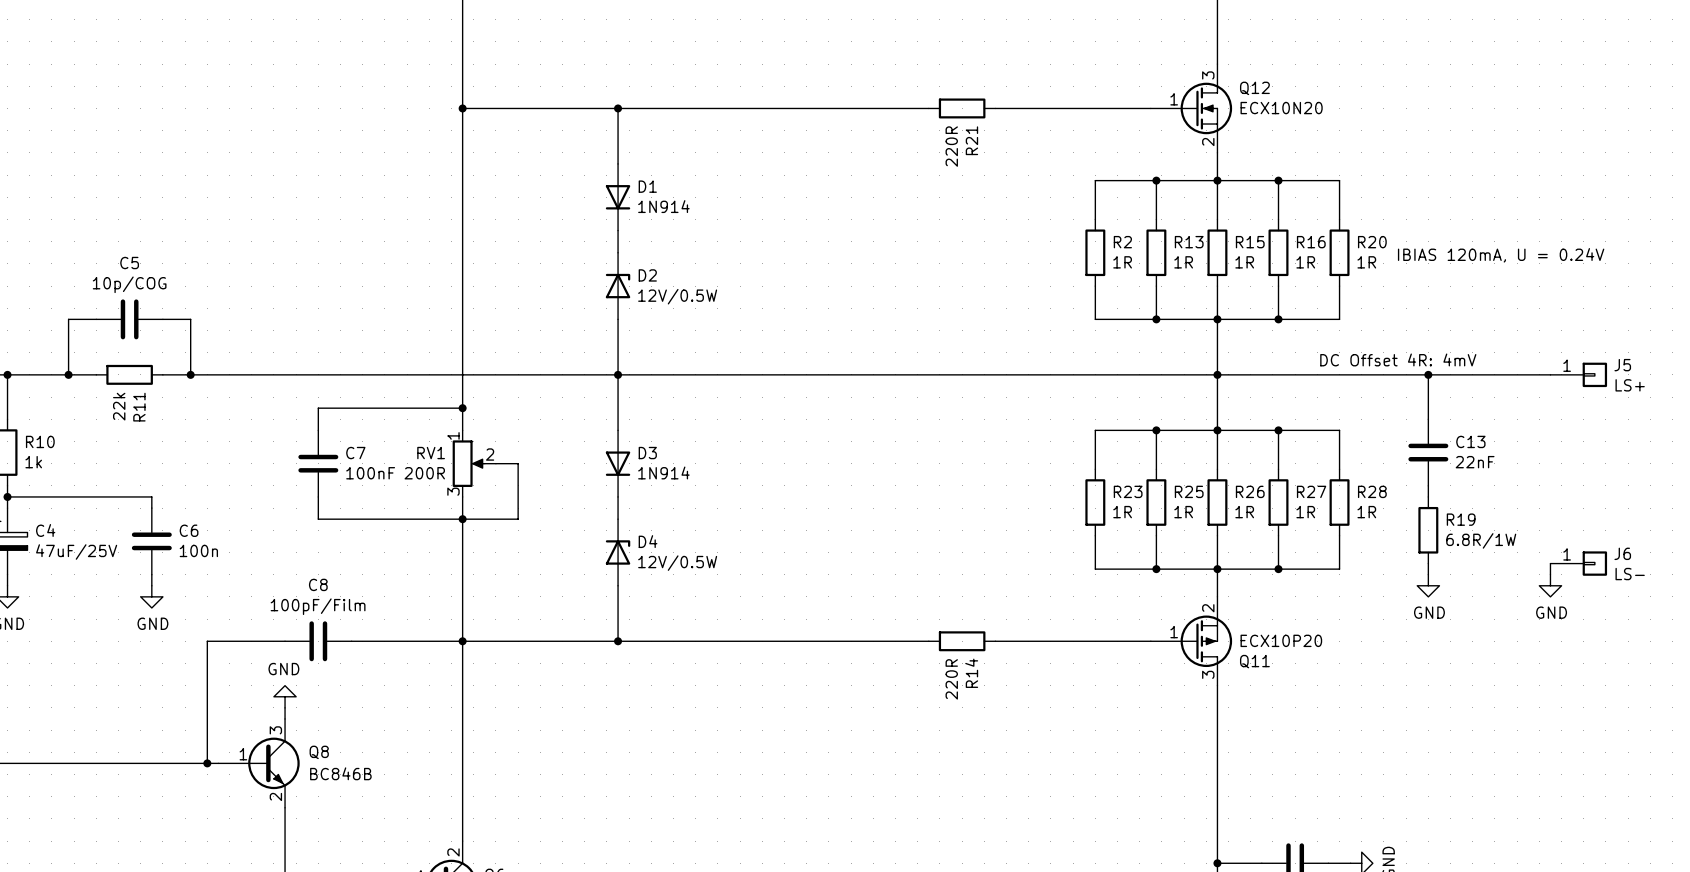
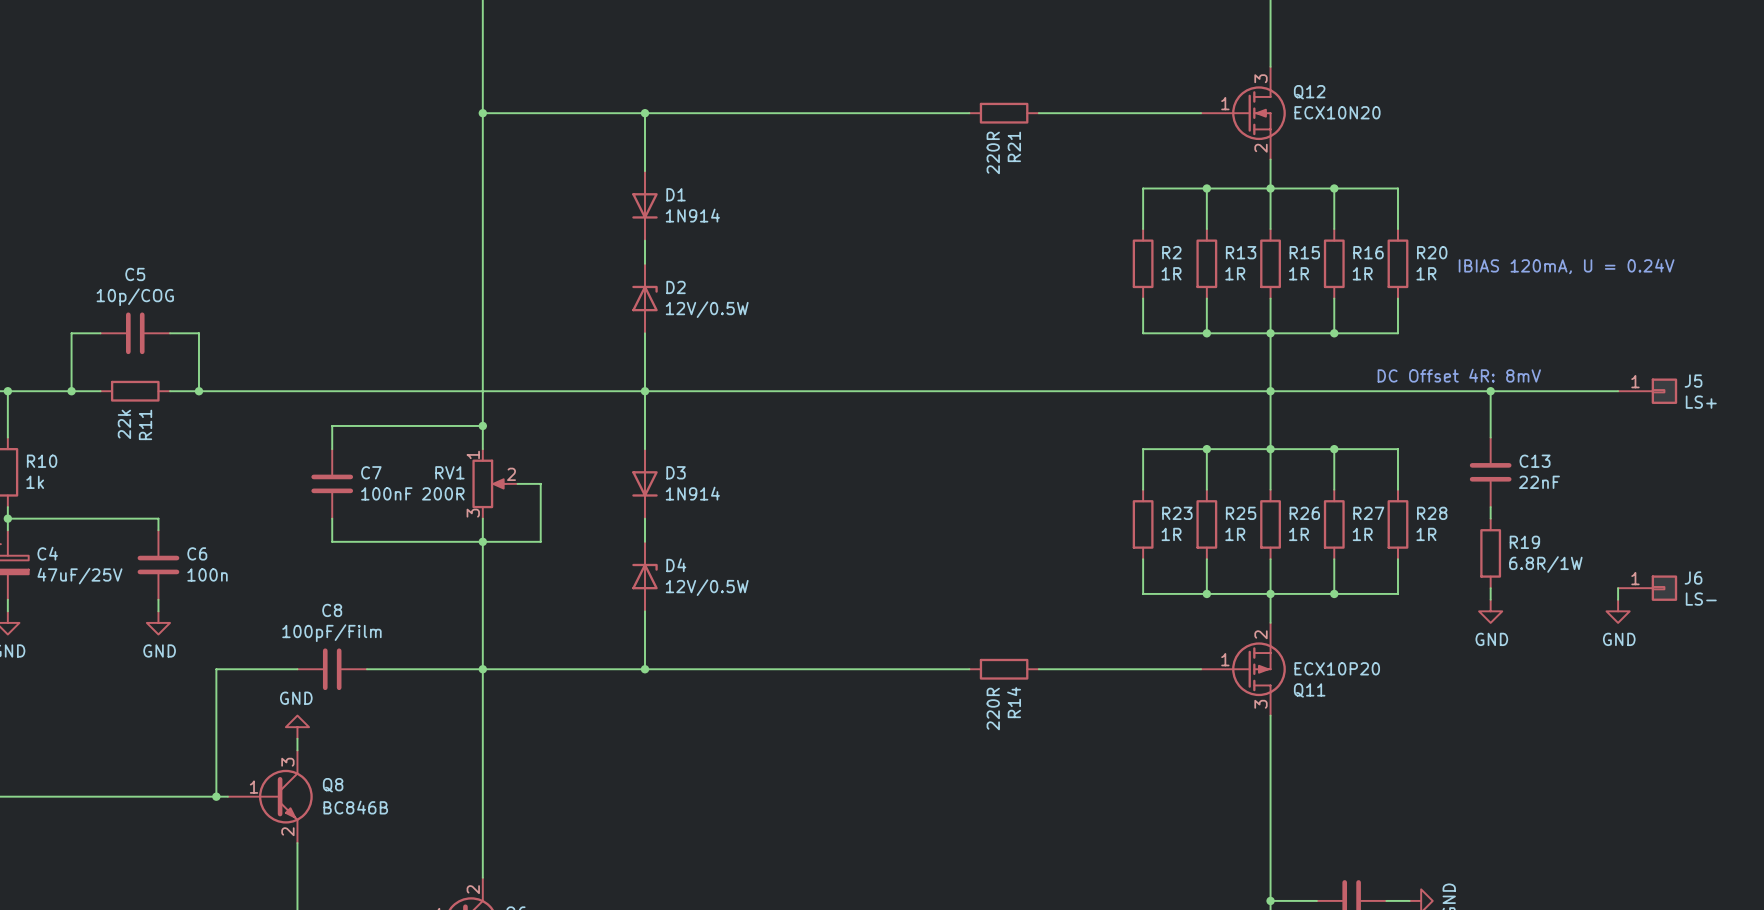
text: DC Offset 4R: 4mV (1398, 359) -> DC Offset 4R: 8mV (1459, 375)

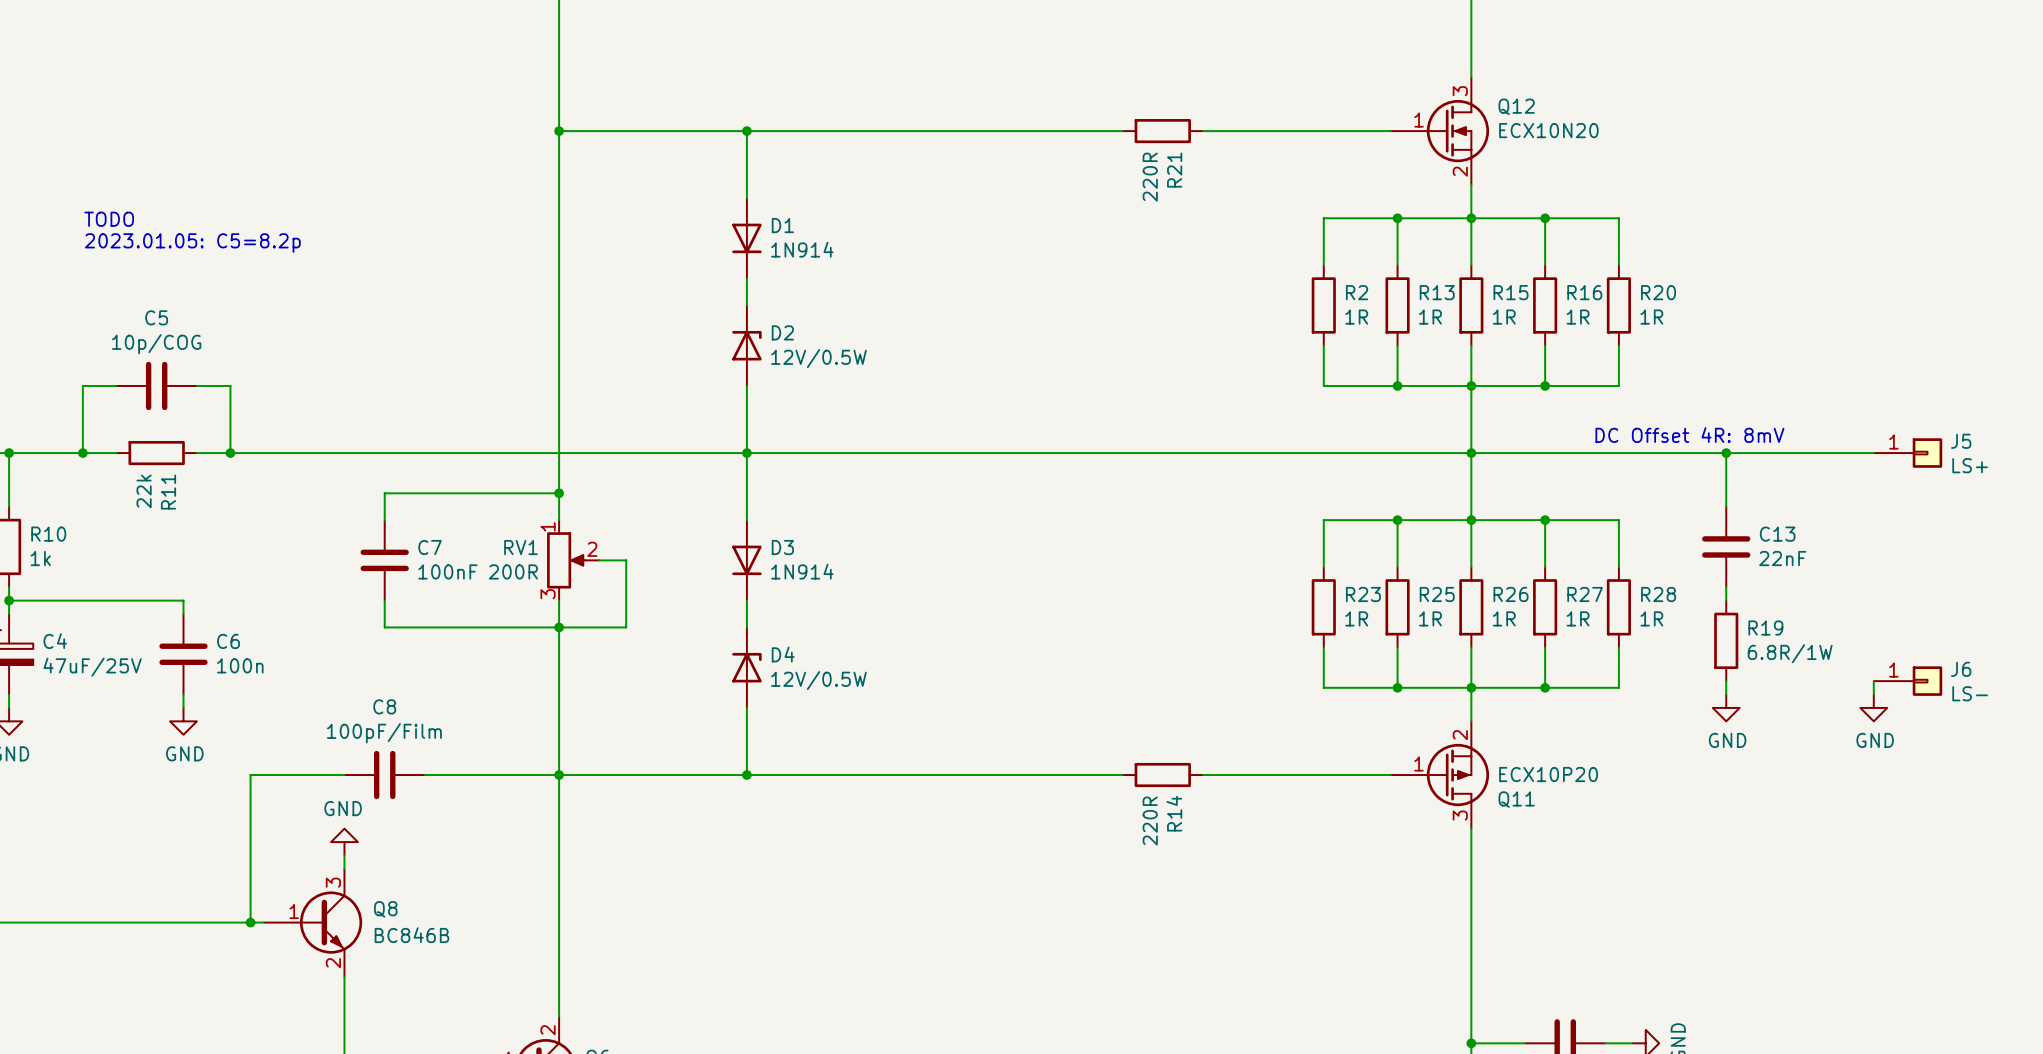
text: none -> TODO (109, 219)
text: none -> 2023.01.05: C5=8.2p (192, 243)
text: IBIAS 120mA, U = 0.24V (1566, 266) -> none

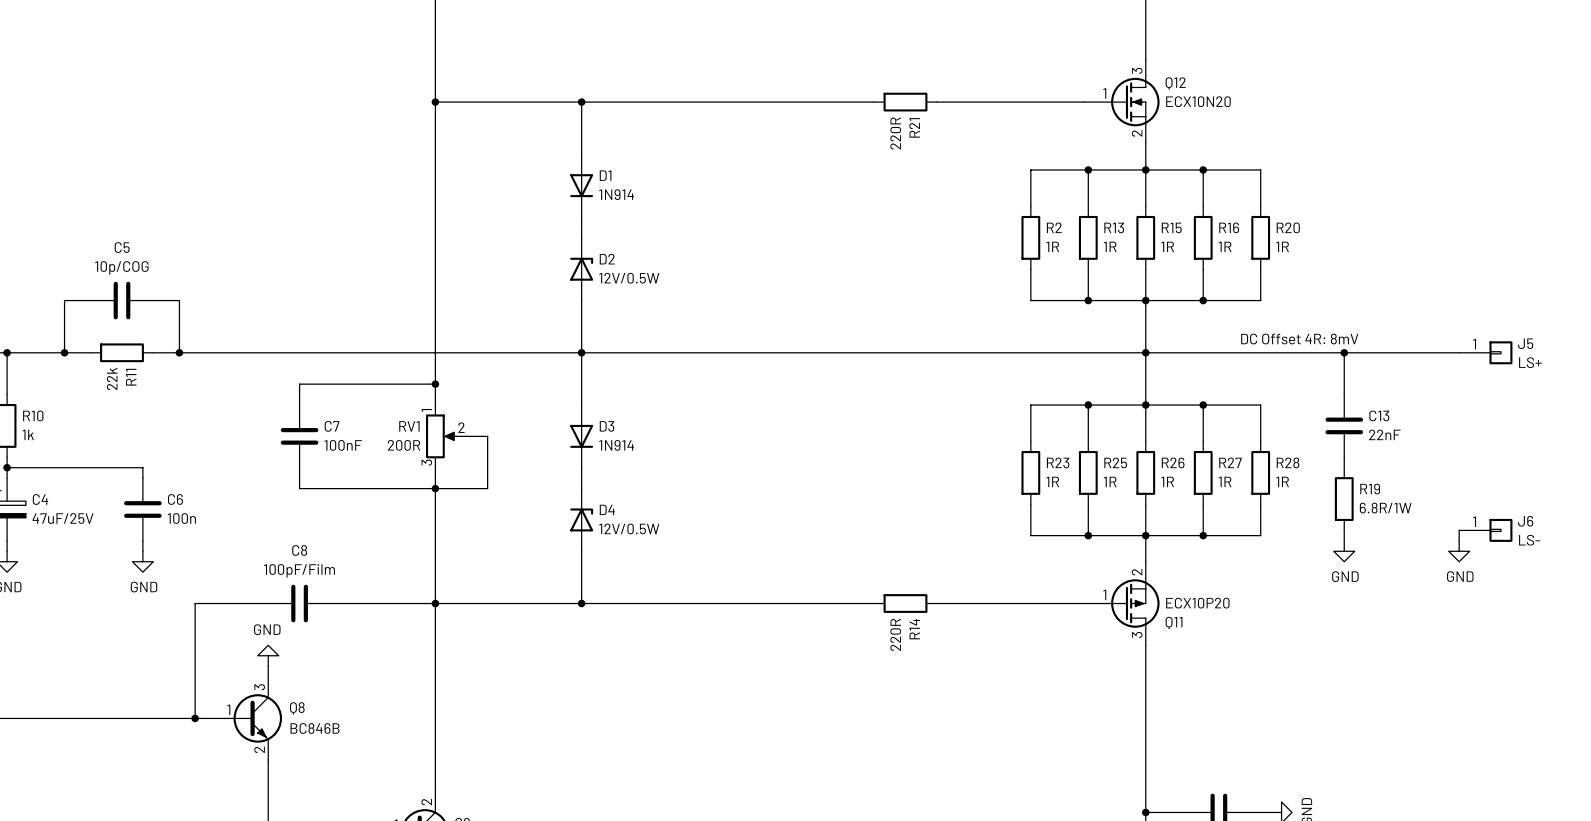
text: TODO (109, 219) -> none
text: 2023.01.05: C5=8.2p (192, 243) -> none

